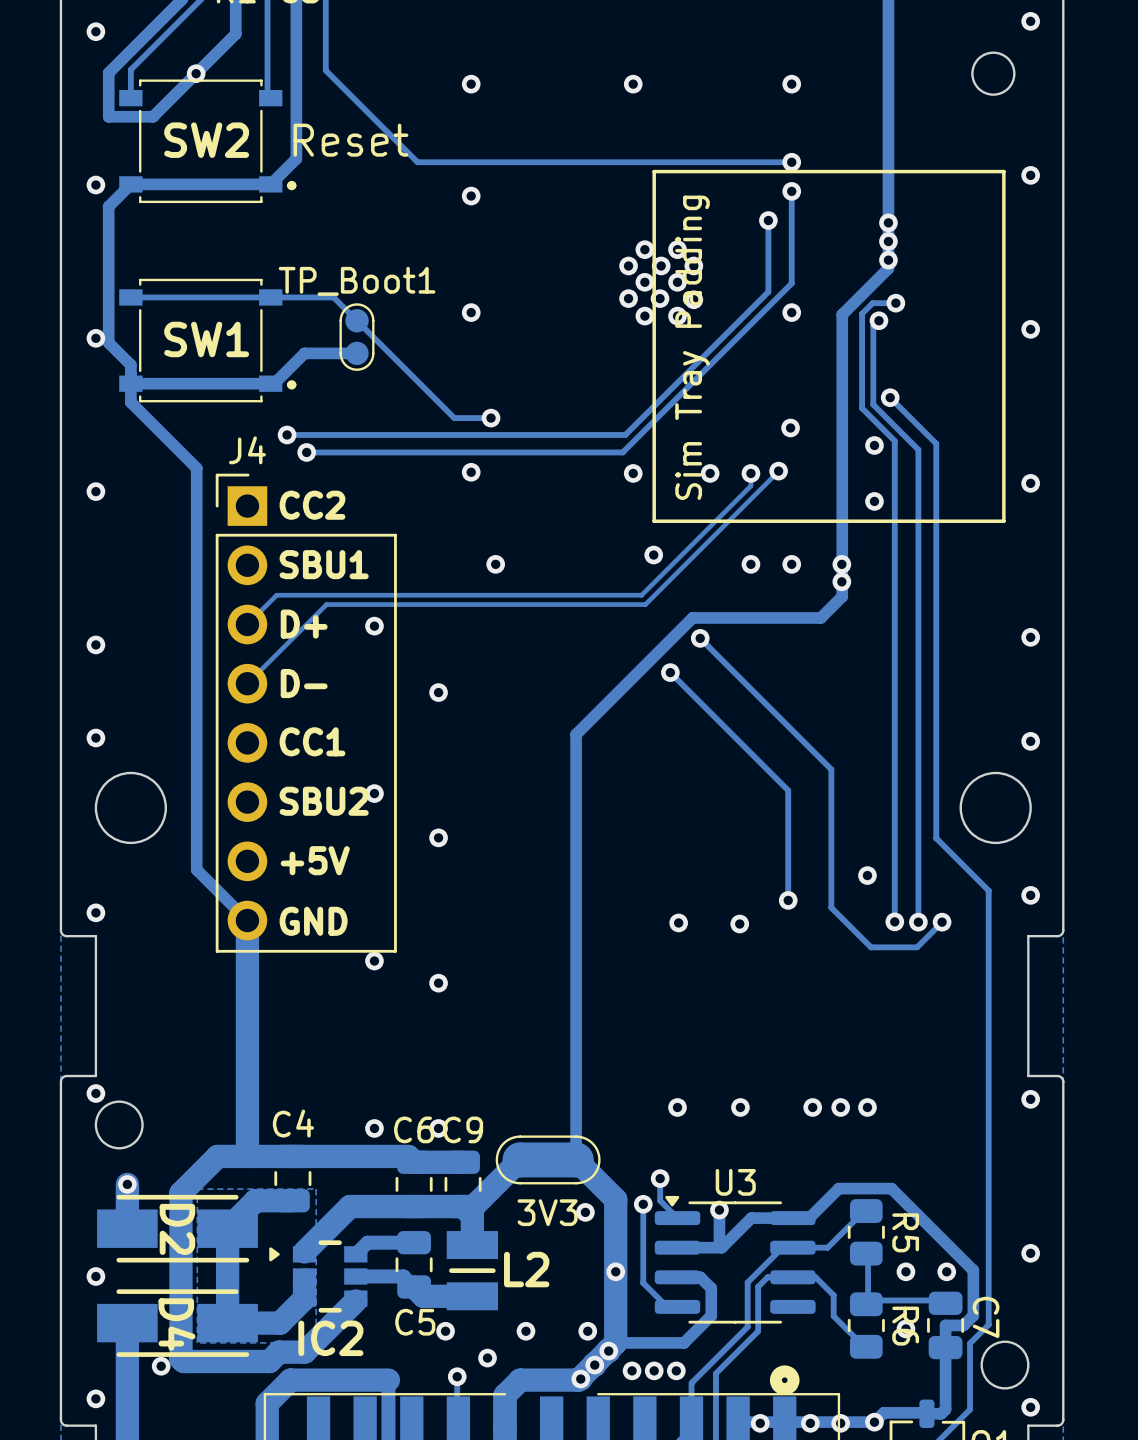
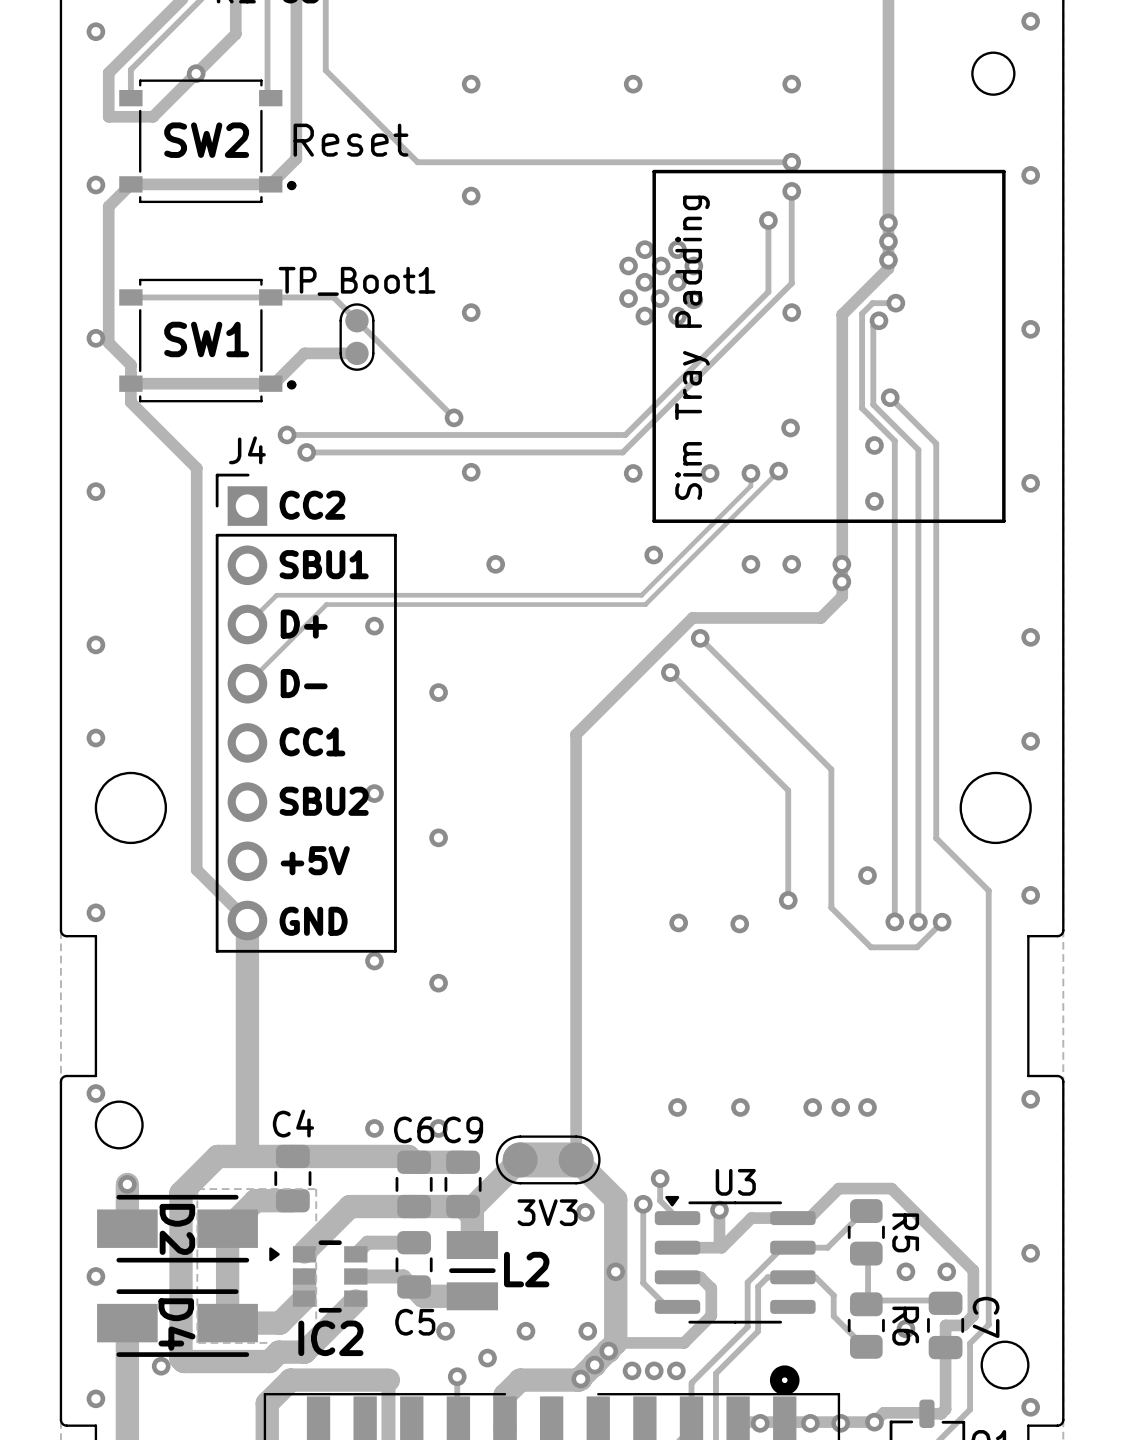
track: (491, 418) (454, 418) -> none
via position: (491, 418) -> (454, 417)

